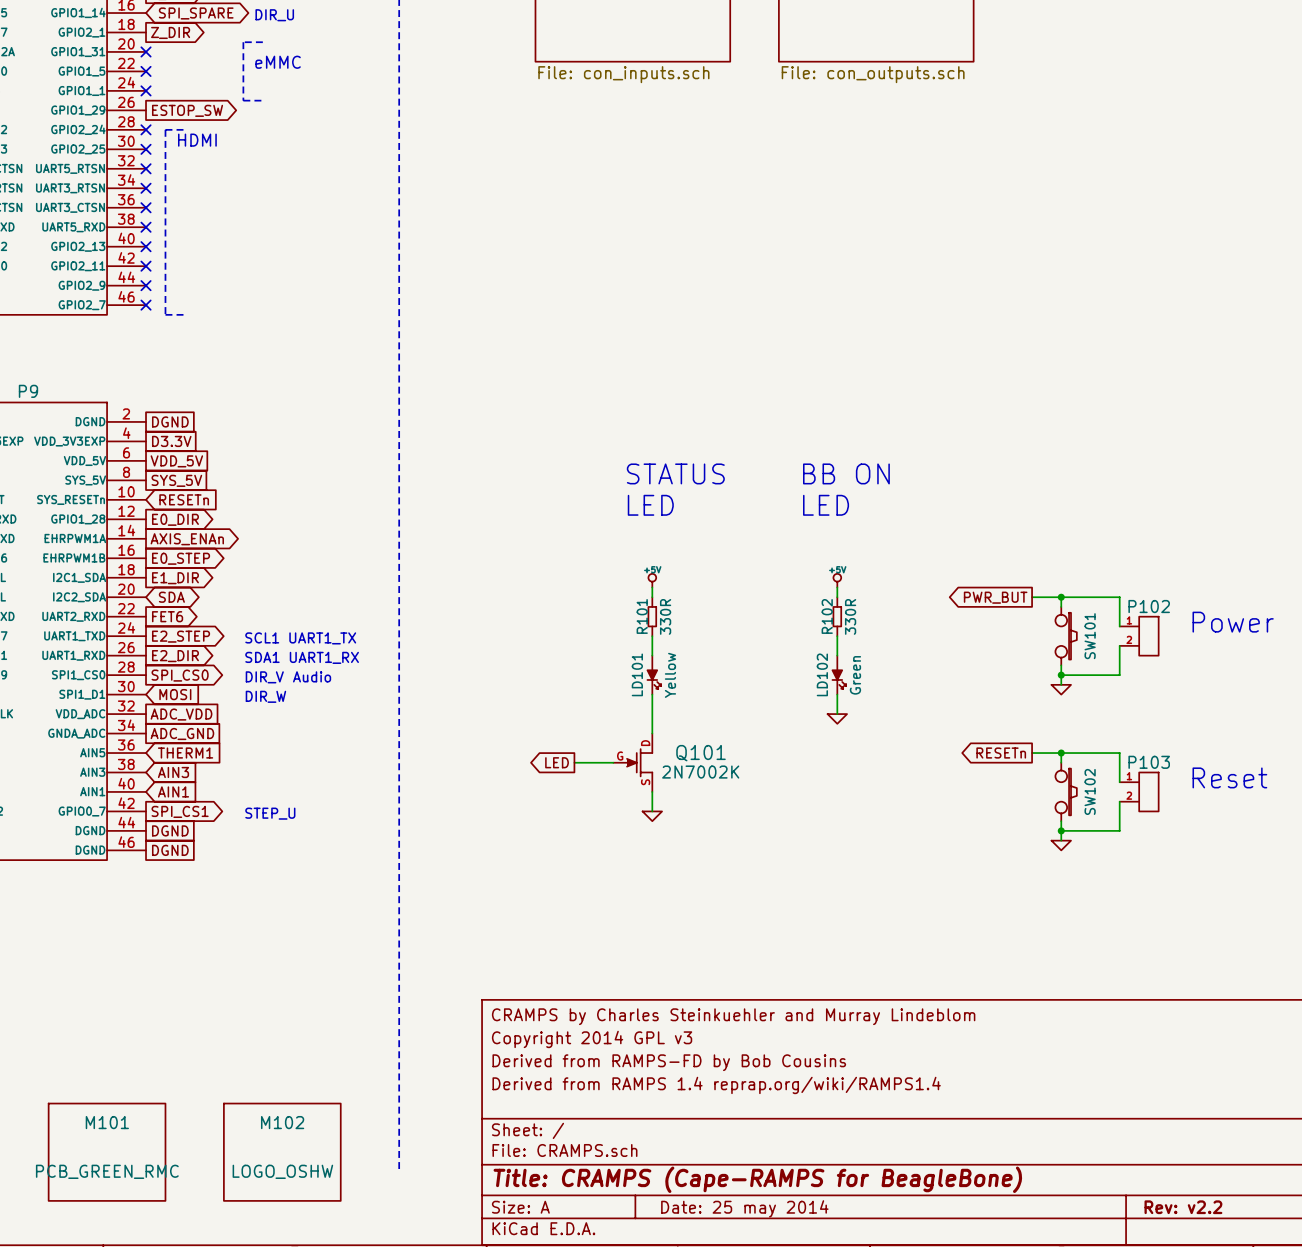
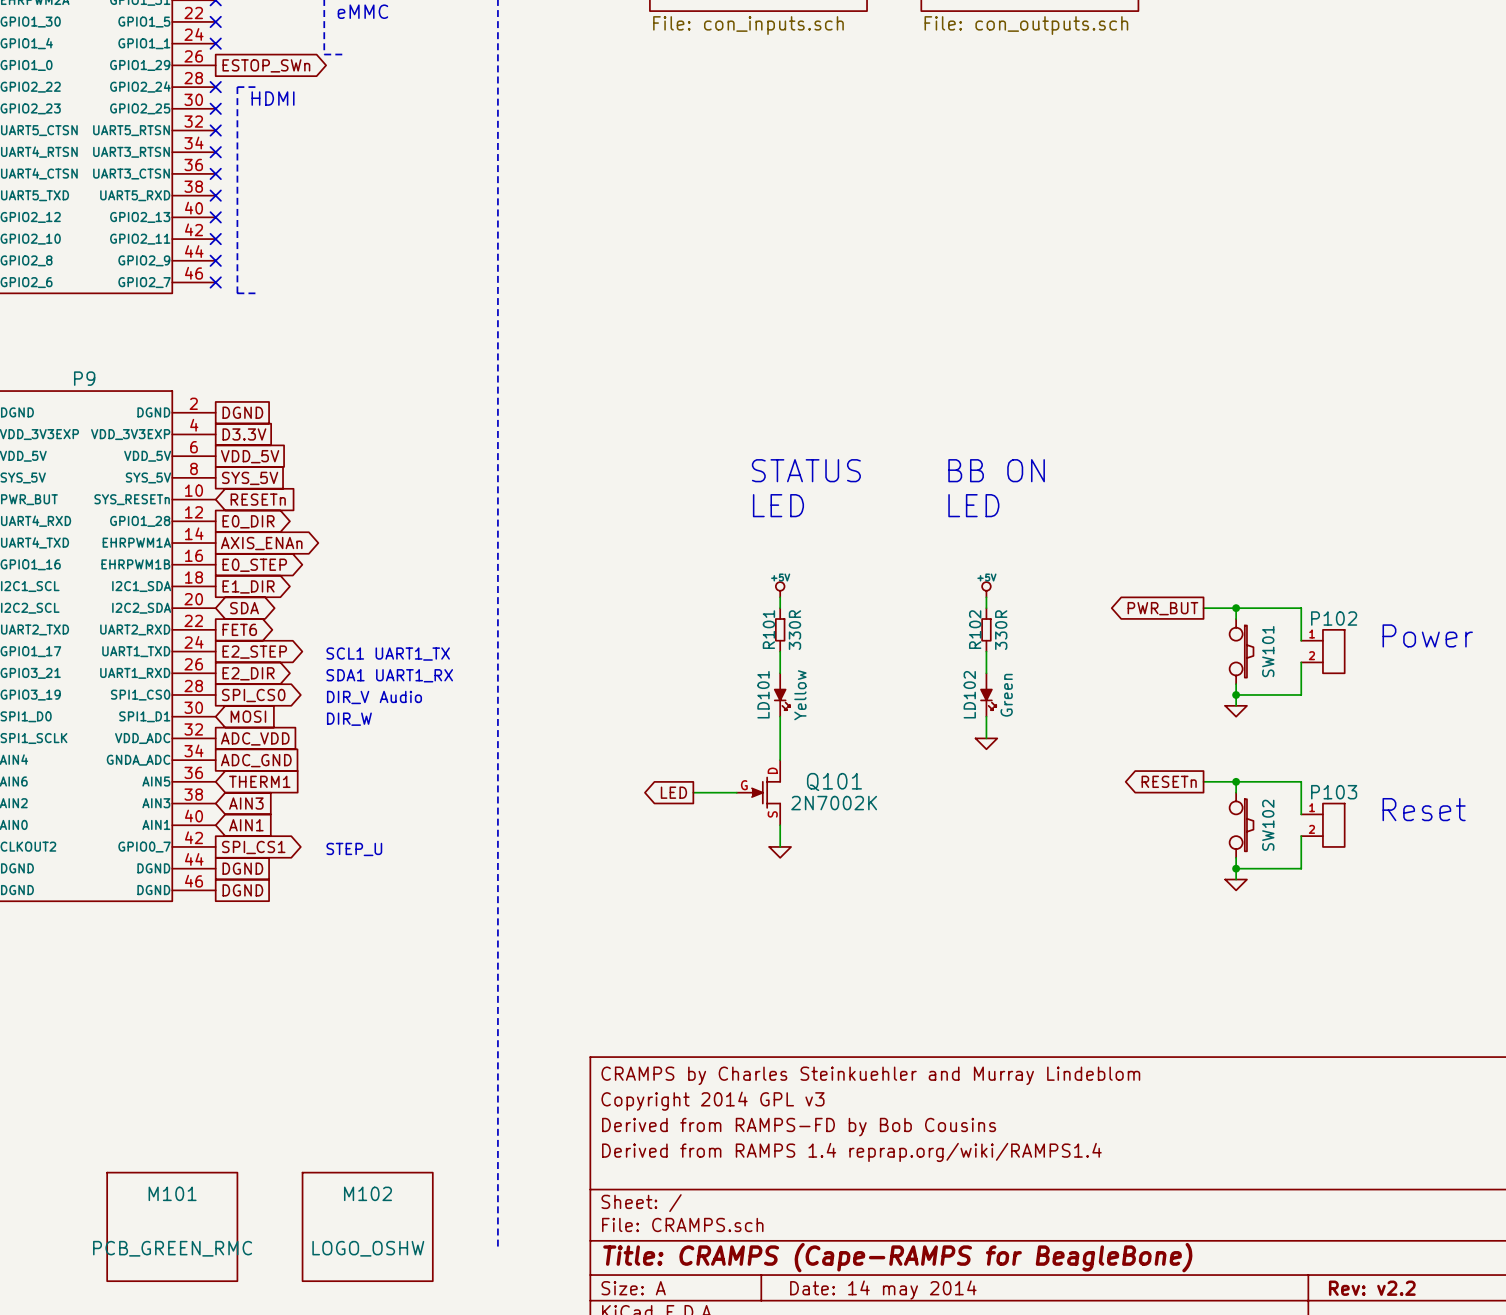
global label: ESTOP_SW (187, 110) -> ESTOP_SWn (266, 65)
title block: Date: 25 may 2014 (744, 1208) -> Date: 14 may 2014 (883, 1290)

